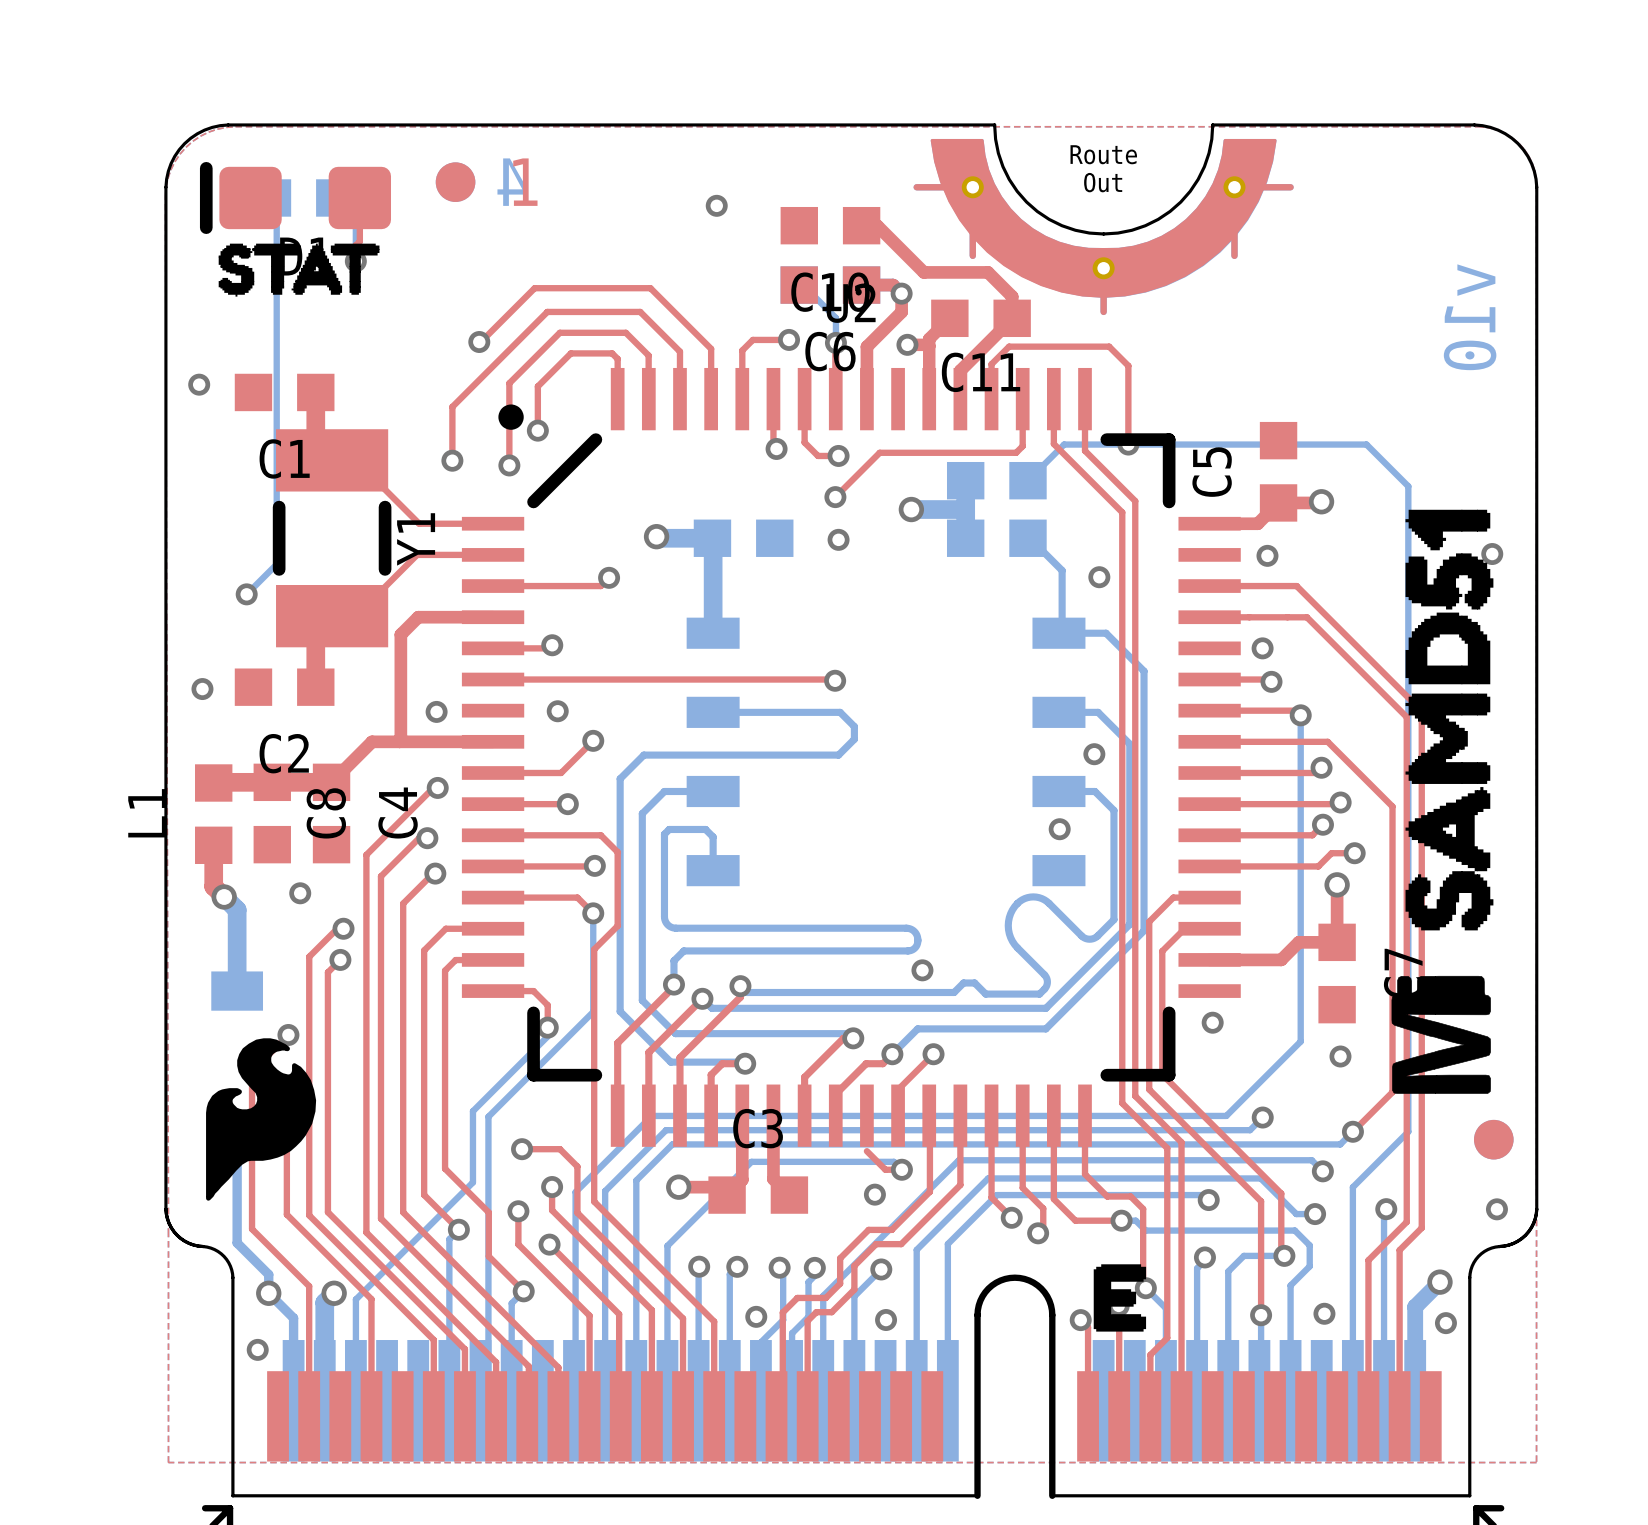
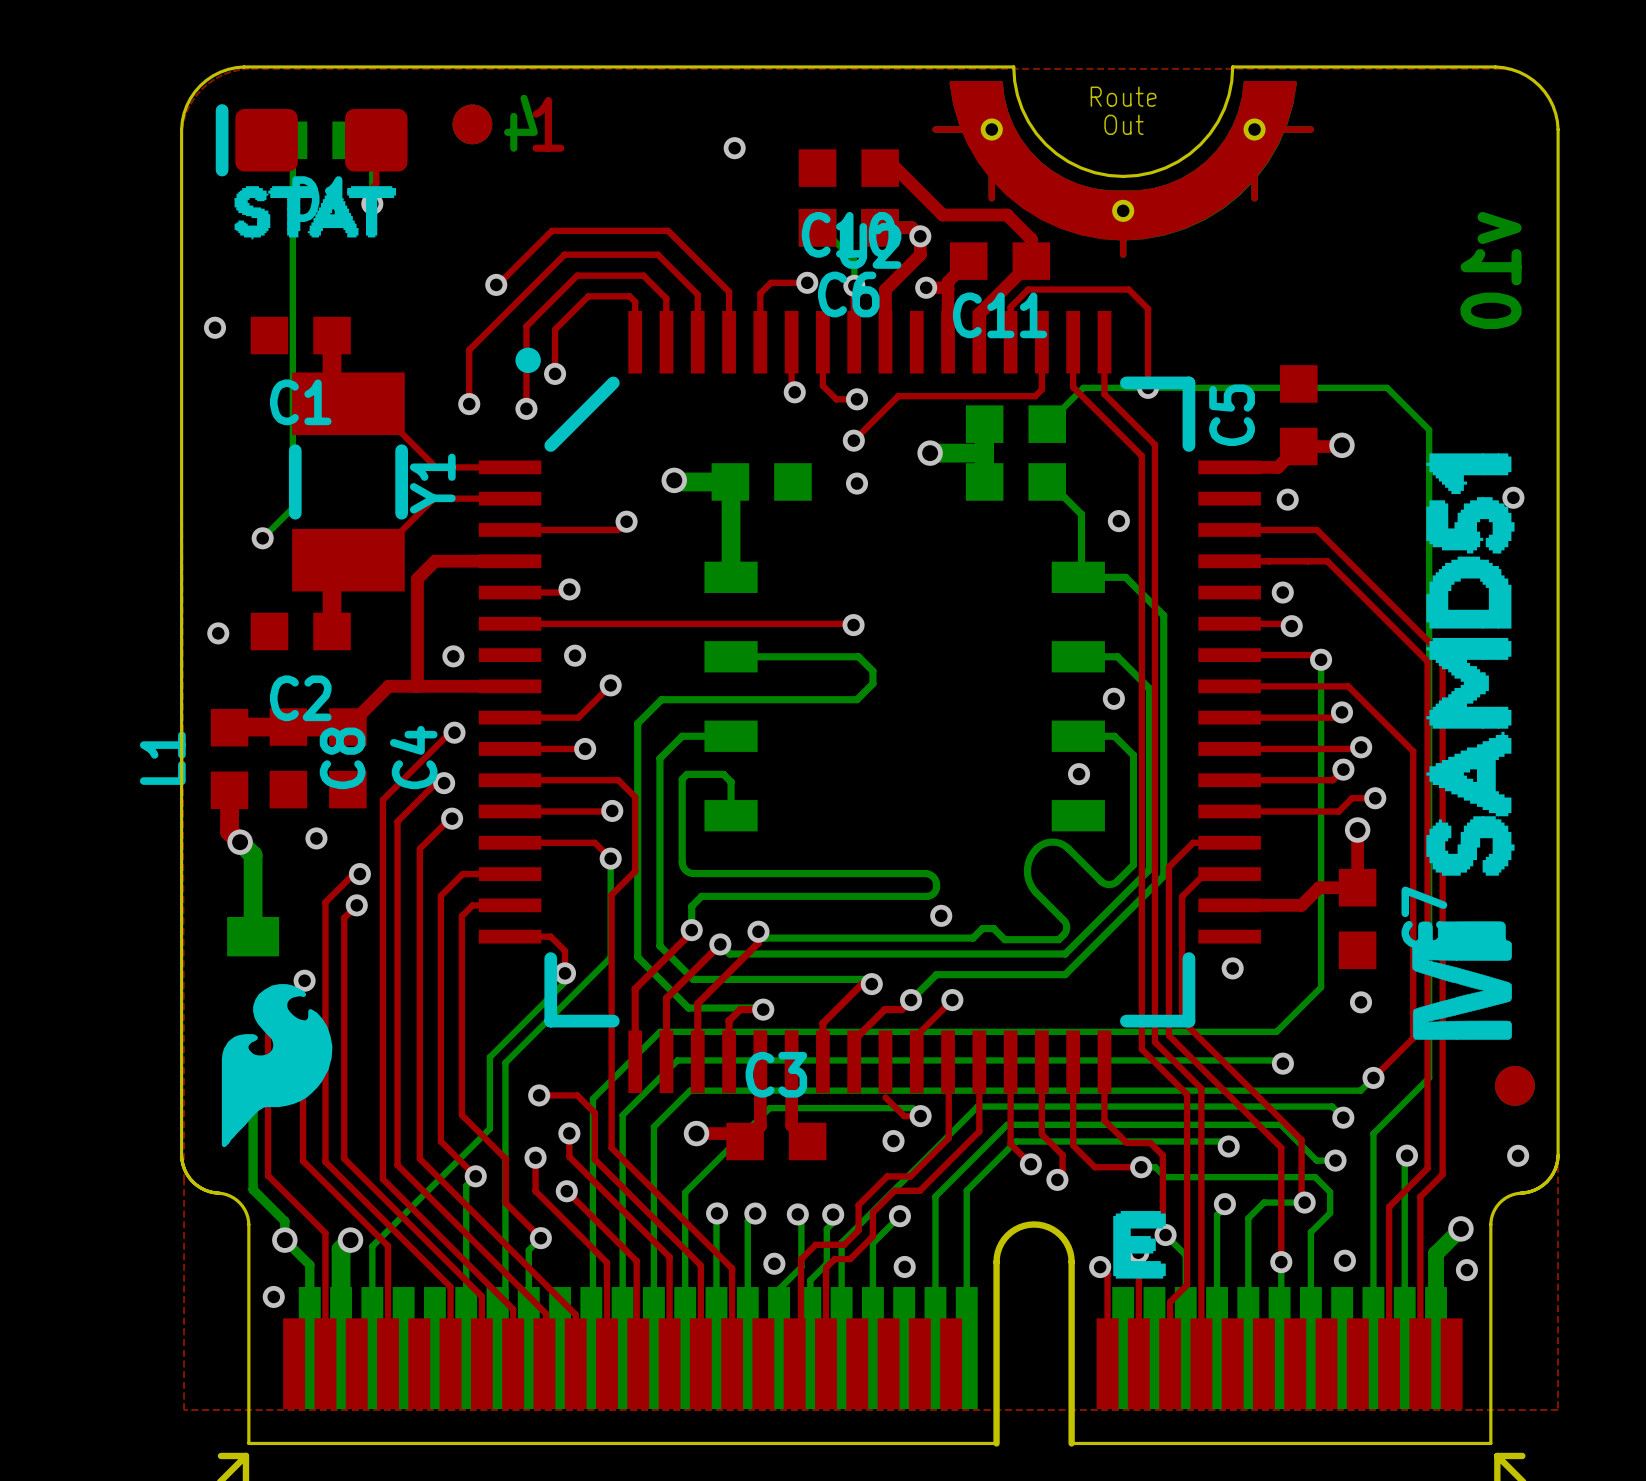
bottom track: (1256, 1085) (1226, 1115) (651, 1115) (575, 1192) -> (1276, 1031) (659, 1031) (592, 1098) (592, 1138)
bottom track: (1262, 1117) (1250, 1130) (666, 1130) (605, 1191) -> (1282, 1063) (1279, 1060) (677, 1060) (622, 1115) (622, 1137)

